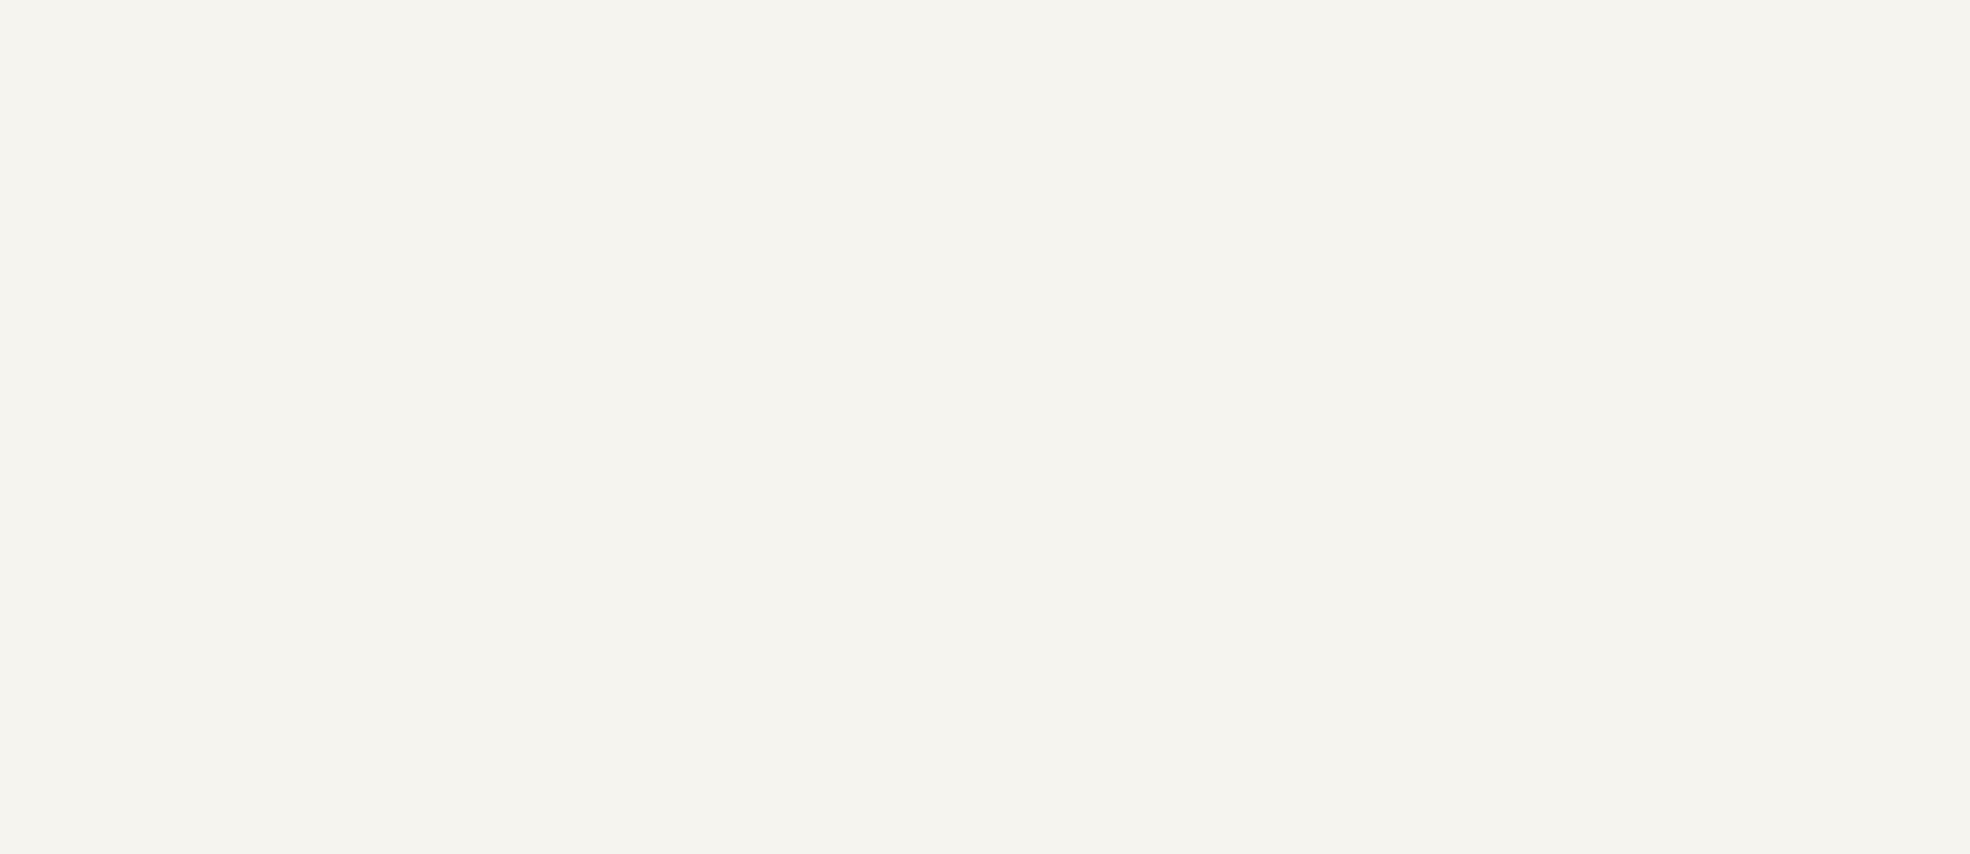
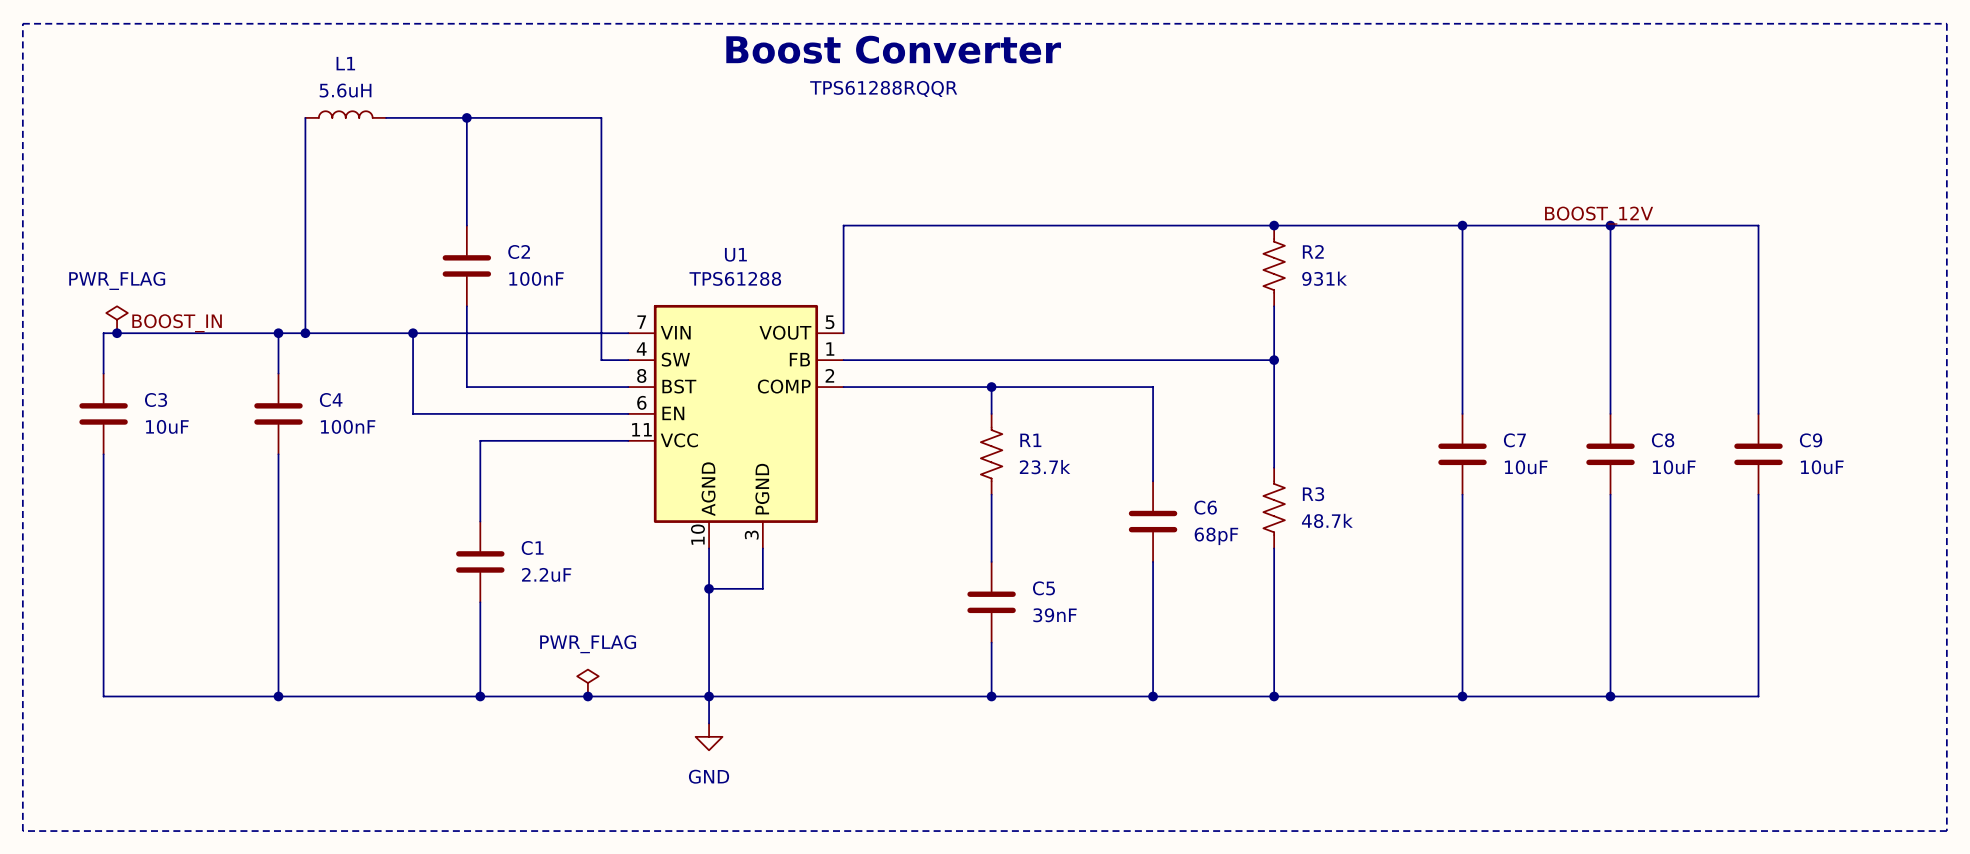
line: none -> (22, 23) (1946, 23) (1946, 831) (22, 831) (22, 23)
text: none -> Boost Converter (893, 49)
text: none -> TPS61288RQQR (883, 88)
L1: none -> 5.6uH (345, 114)
wire: none -> (305, 117) (305, 333)
wire: none -> (386, 117) (601, 117) (601, 360) (628, 360)
wire: none -> (466, 117) (466, 225)
junction: none -> (466, 117)
label: none -> BOOST_12V (1599, 215)
junction: none -> (1274, 225)
wire: none -> (1462, 225) (1462, 413)
junction: none -> (1462, 225)
wire: none -> (1610, 225) (1610, 413)
junction: none -> (1610, 225)
C2: none -> 100nF (466, 265)
R2: none -> 931k (1274, 265)
wire: none -> (466, 306) (466, 387) (628, 387)
wire: none -> (1274, 306) (1274, 467)
power symbol: none -> PWR_FLAG (117, 319)
label: none -> BOOST_IN (177, 323)
junction: none -> (117, 333)
wire: none -> (278, 333) (278, 373)
junction: none -> (278, 333)
junction: none -> (305, 333)
wire: none -> (413, 333) (413, 413) (628, 413)
junction: none -> (413, 333)
wire: none -> (628, 333) (103, 333) (103, 373)
wire: none -> (843, 333) (843, 225) (1758, 225) (1758, 413)
wire: none -> (843, 360) (1274, 360)
junction: none -> (1274, 360)
wire: none -> (843, 387) (1153, 387) (1153, 481)
wire: none -> (991, 387) (991, 413)
junction: none -> (991, 387)
C3: none -> 10uF (103, 413)
C4: none -> 100nF (278, 413)
U1: none -> TPS61288 (735, 426)
wire: none -> (628, 440) (480, 440) (480, 521)
wire: none -> (103, 454) (103, 696) (1758, 696) (1758, 494)
wire: none -> (278, 454) (278, 696)
R1: none -> 23.7k (991, 454)
C7: none -> 10uF (1462, 454)
C8: none -> 10uF (1610, 454)
C9: none -> 10uF (1758, 454)
wire: none -> (991, 494) (991, 561)
wire: none -> (1462, 494) (1462, 696)
wire: none -> (1610, 494) (1610, 696)
R3: none -> 48.7k (1274, 508)
C6: none -> 68pF (1153, 521)
wire: none -> (709, 548) (709, 723)
wire: none -> (762, 548) (762, 588) (709, 588)
wire: none -> (1274, 548) (1274, 696)
C1: none -> 2.2uF (480, 561)
wire: none -> (1153, 561) (1153, 696)
junction: none -> (709, 588)
wire: none -> (480, 602) (480, 696)
C5: none -> 39nF (991, 602)
wire: none -> (991, 642) (991, 696)
power symbol: none -> PWR_FLAG (587, 683)
junction: none -> (278, 696)
junction: none -> (480, 696)
junction: none -> (587, 696)
junction: none -> (709, 696)
junction: none -> (991, 696)
junction: none -> (1153, 696)
junction: none -> (1274, 696)
junction: none -> (1462, 696)
junction: none -> (1610, 696)
power symbol: none -> GND (709, 736)

